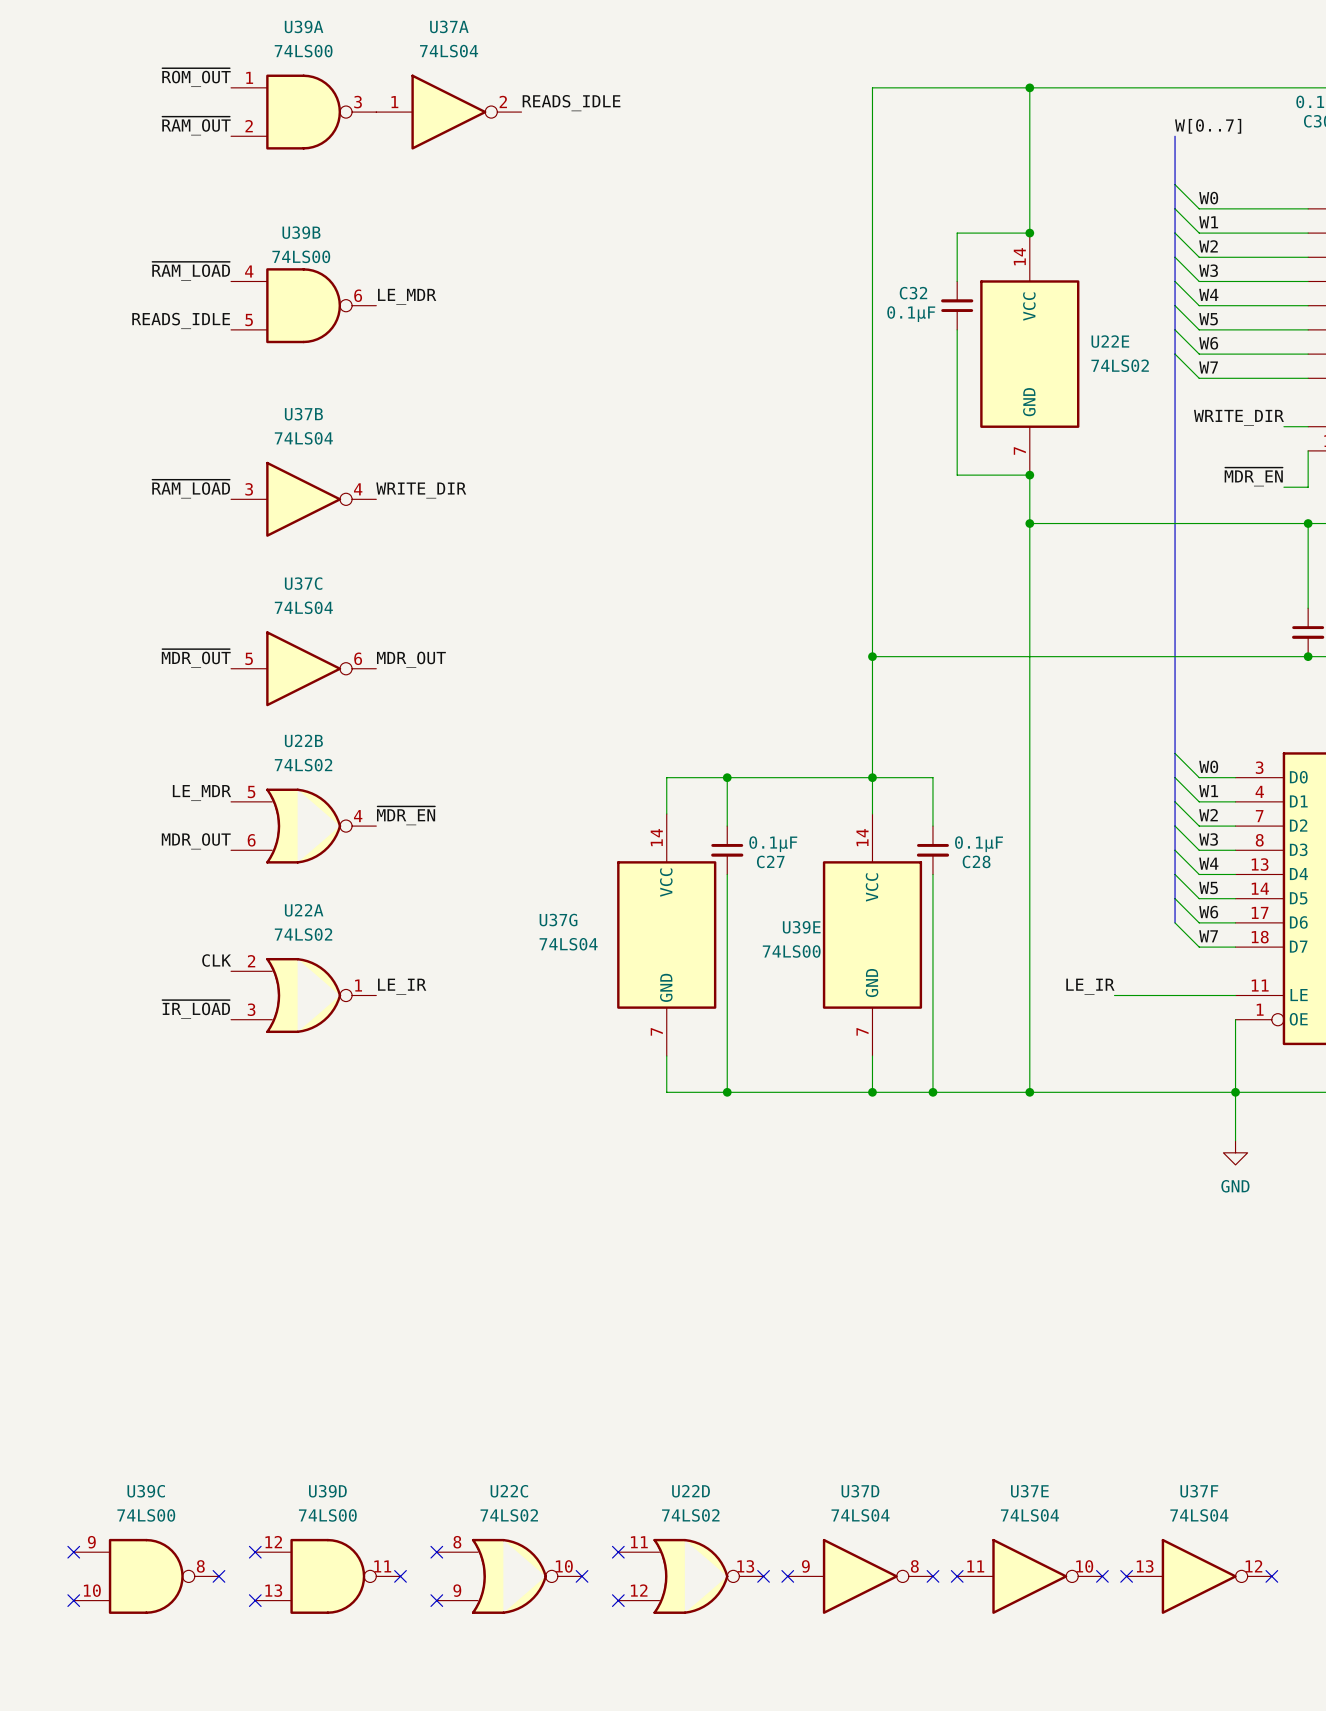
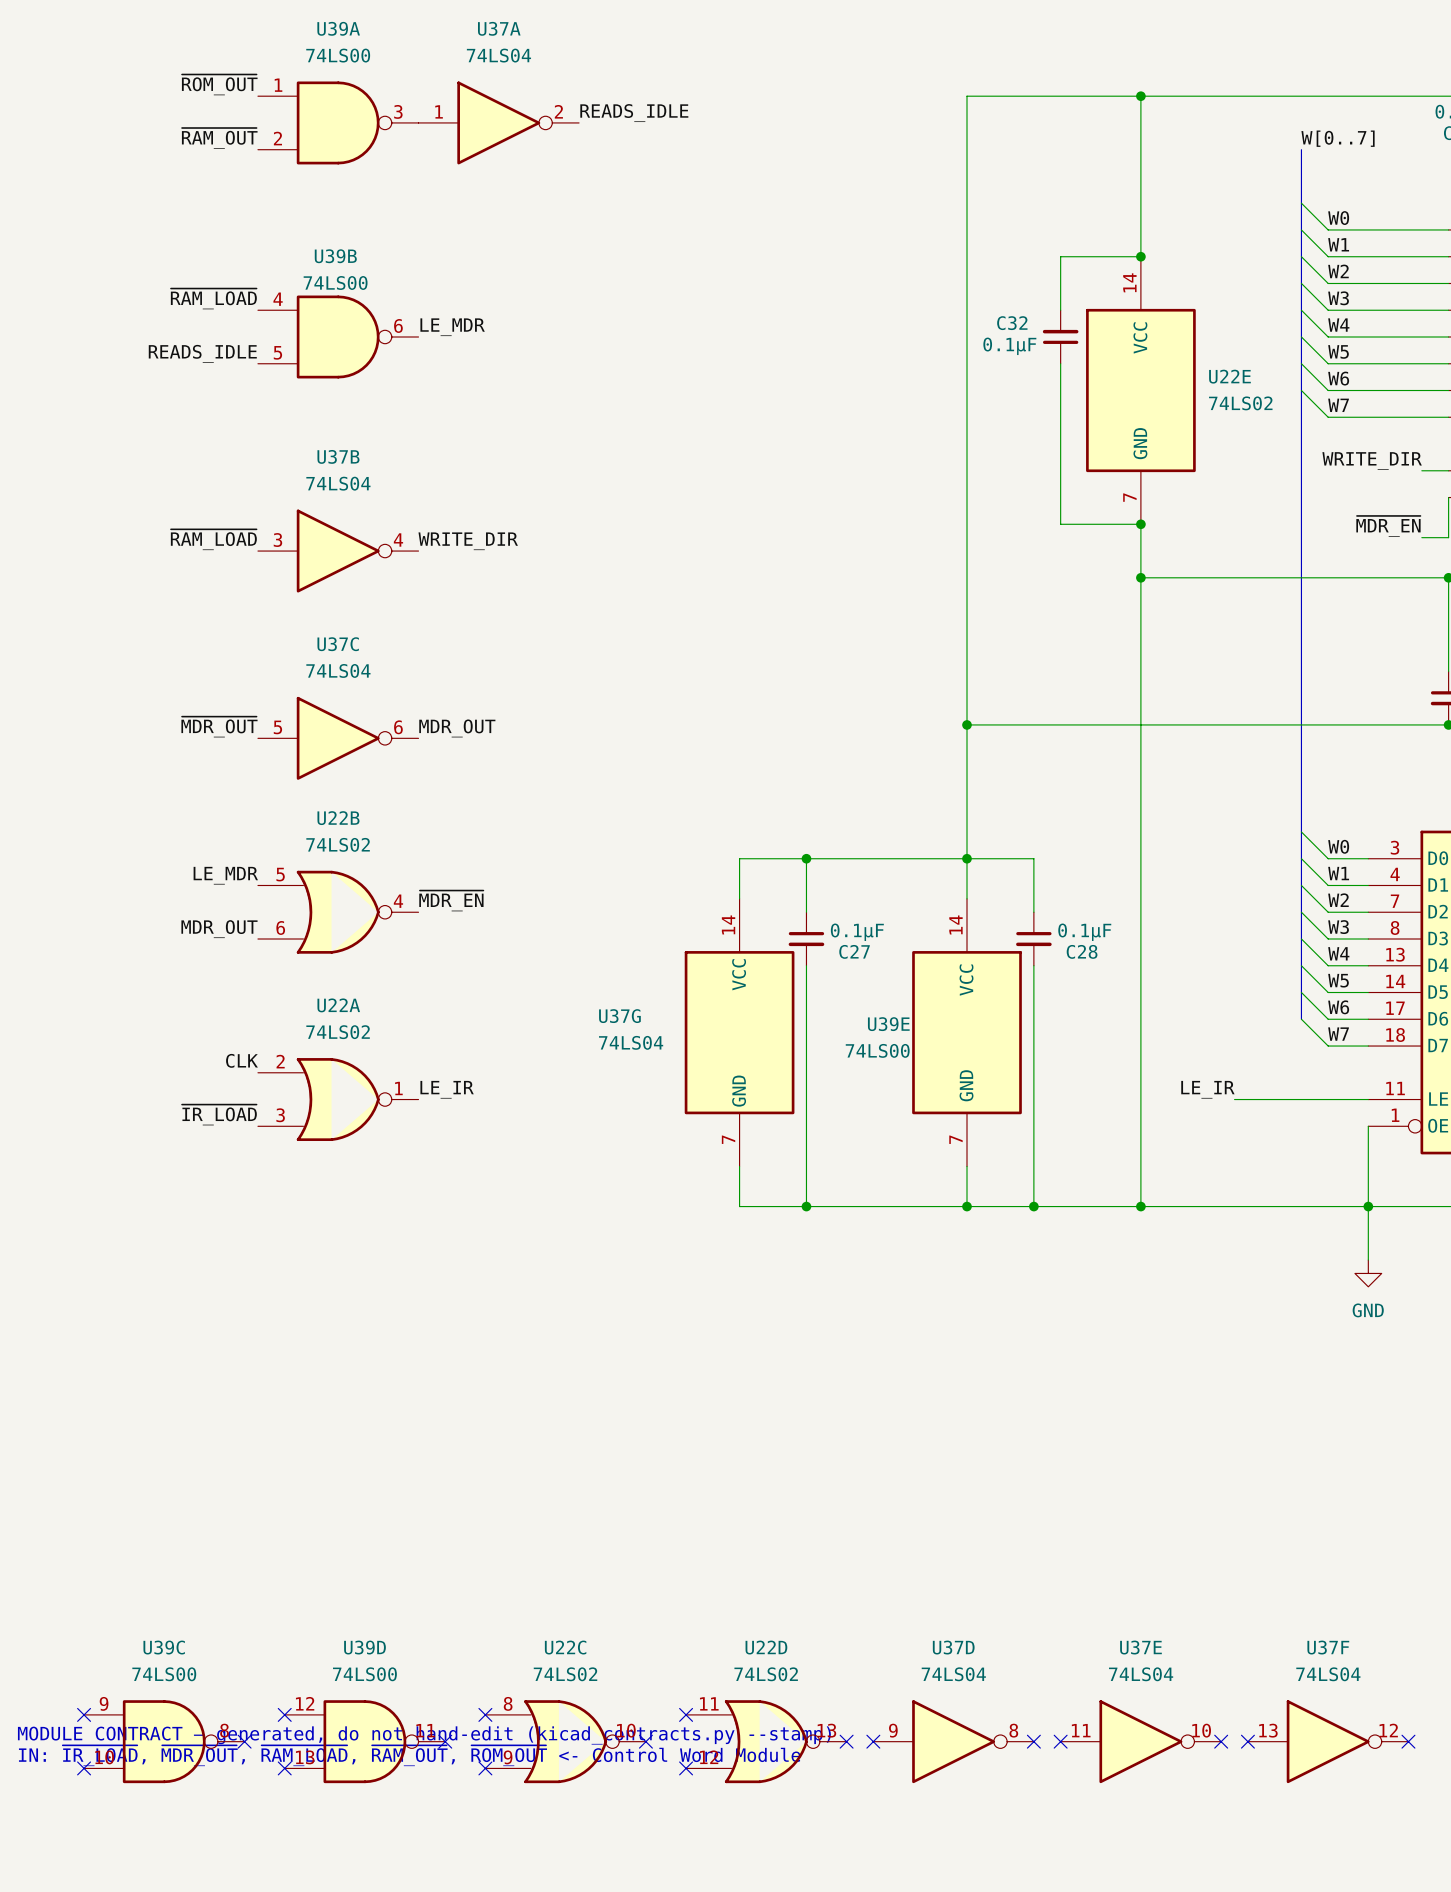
text: none -> MODULE CONTRACT — generated, do not hand-edit (kicad_contracts.py --stamp) (424, 1735)
text: none -> IN: ~{IR_LOAD}, ~{MDR_OUT}, ~{RAM_LOAD}, ~{RAM_OUT}, ~{ROM_OUT} <- Control Word Module (409, 1755)

